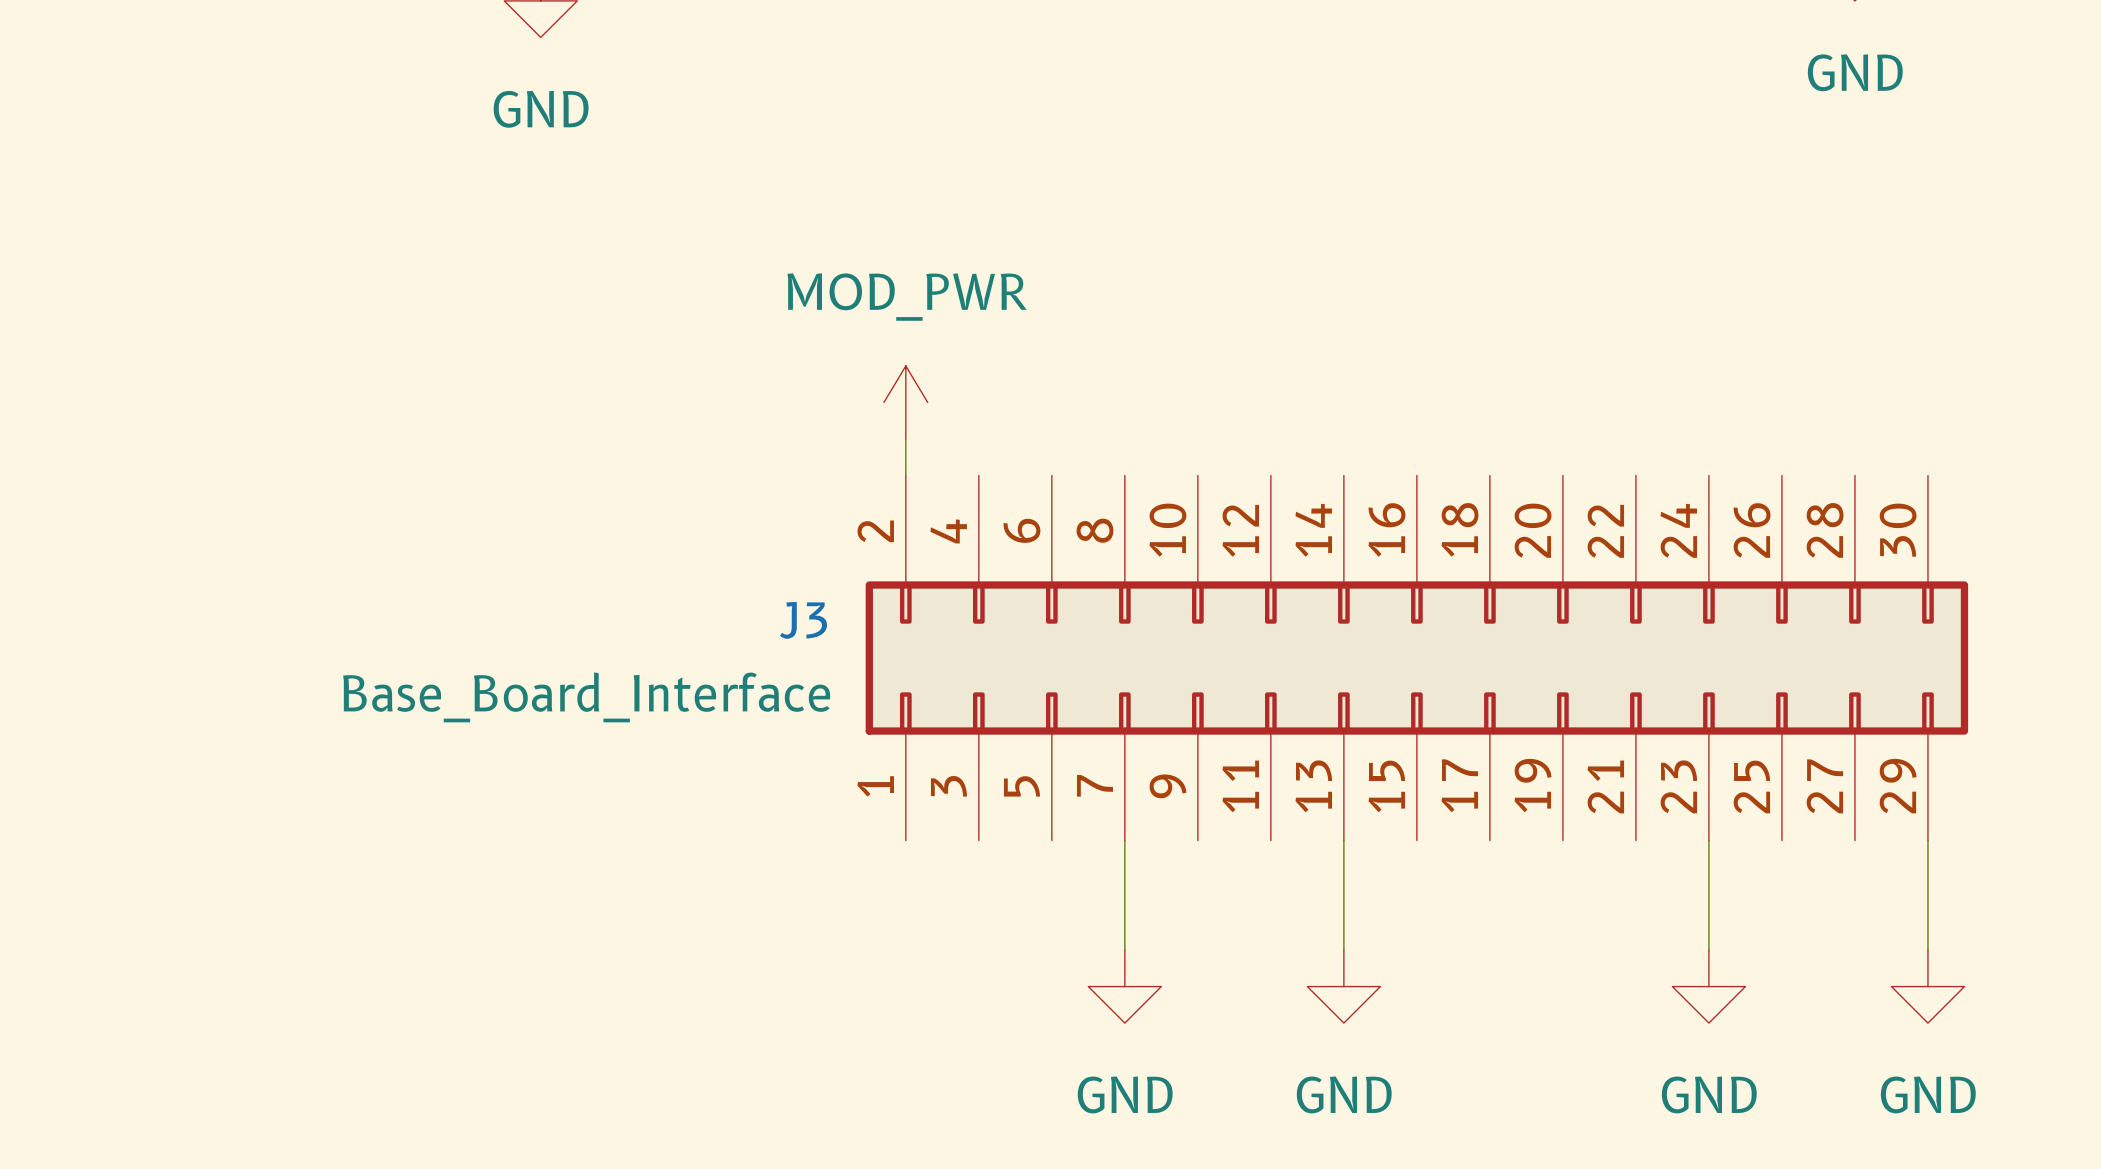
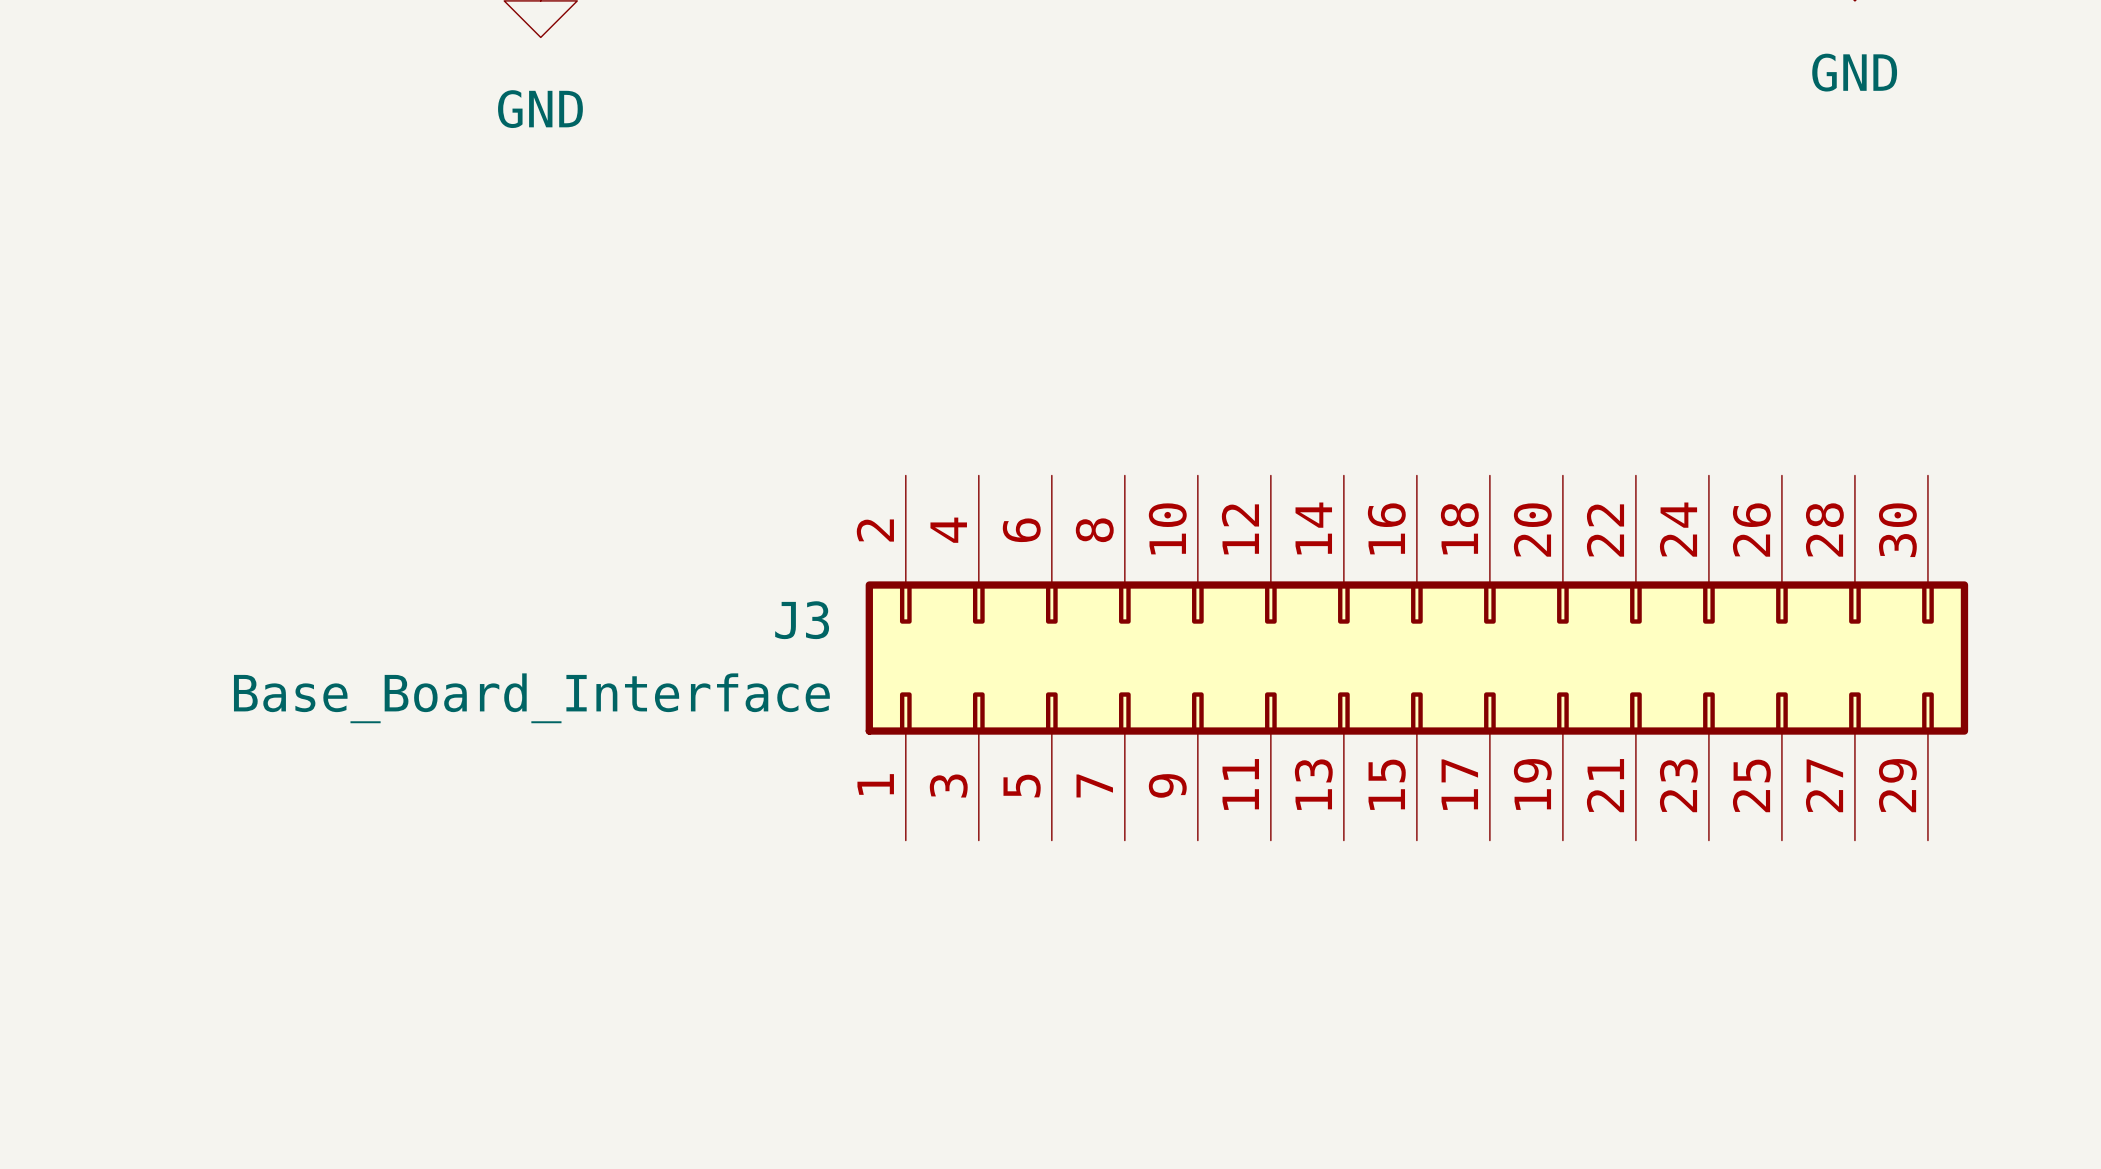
power symbol: MOD_PWR (905, 402) -> none
wire: (905, 438) (905, 475) -> none
wire: (1124, 840) (1124, 950) -> none
wire: (1343, 840) (1343, 950) -> none
wire: (1708, 840) (1708, 950) -> none
wire: (1927, 840) (1927, 950) -> none
power symbol: GND (1124, 986) -> none
power symbol: GND (1343, 986) -> none
power symbol: GND (1708, 986) -> none
power symbol: GND (1927, 986) -> none

